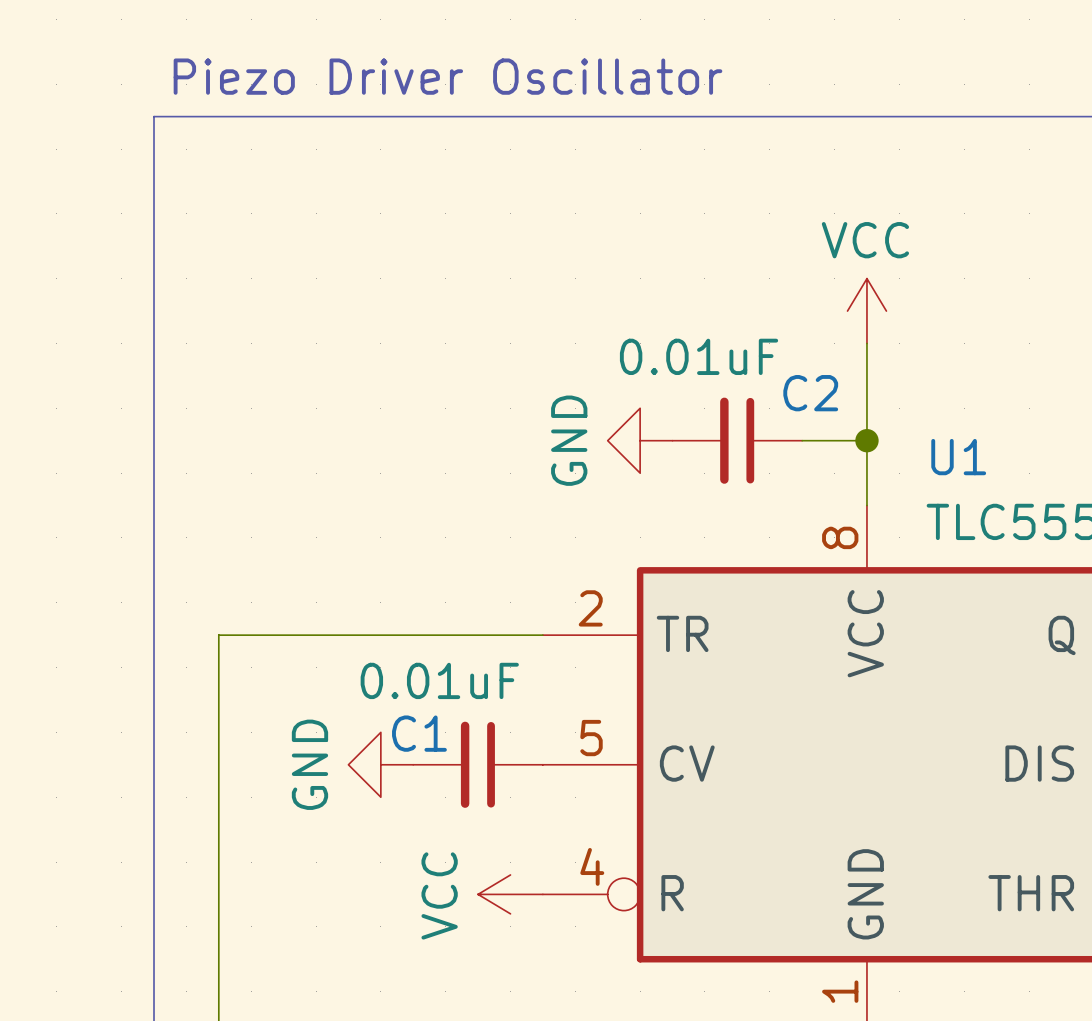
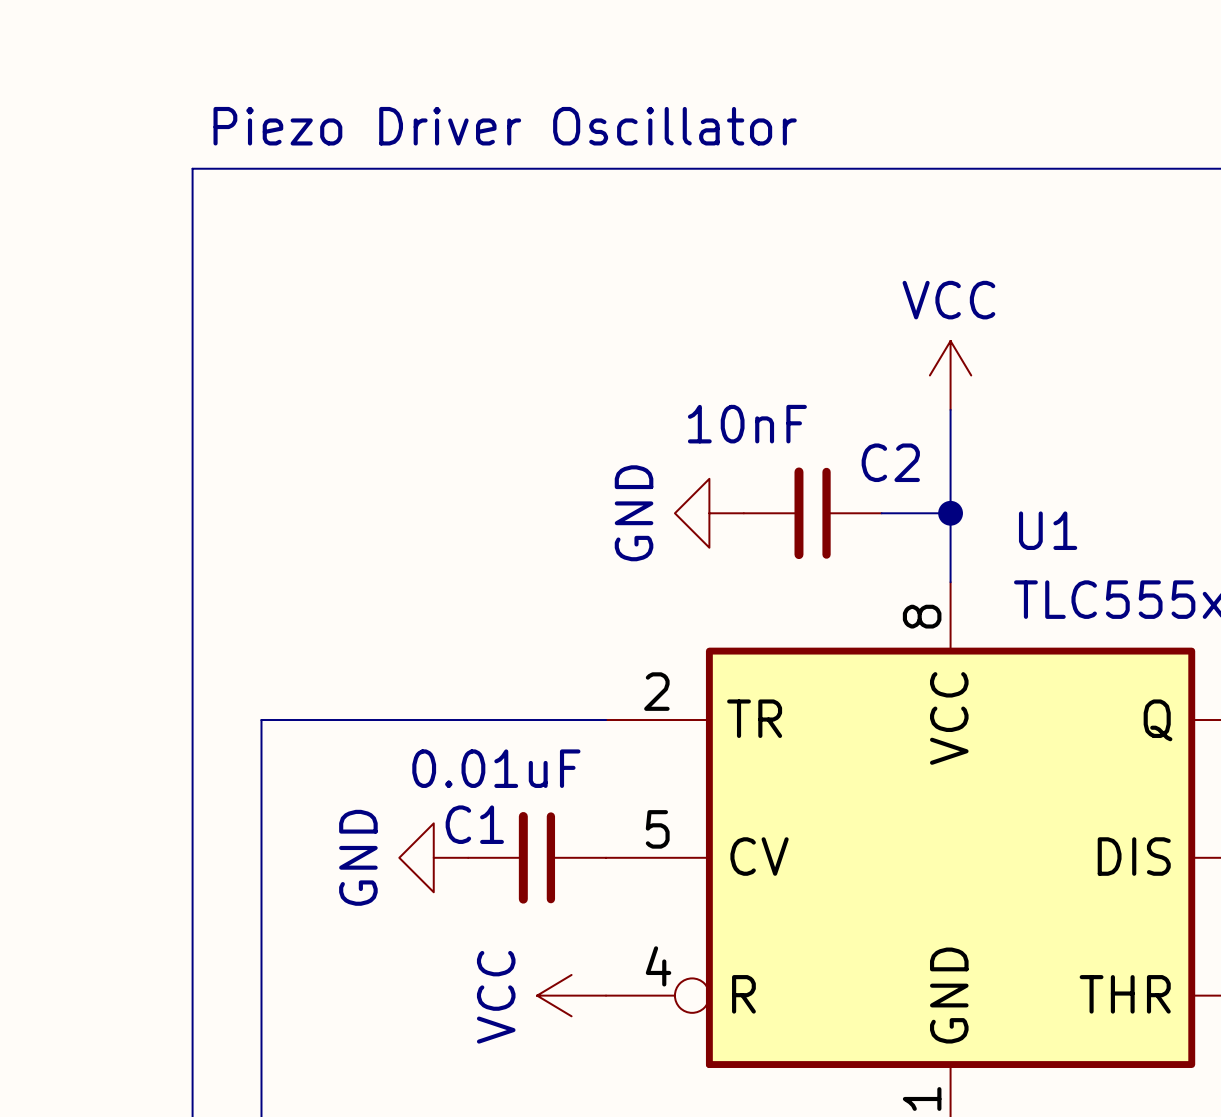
C2 value: 0.01uF (699, 356) -> 10nF (747, 424)

